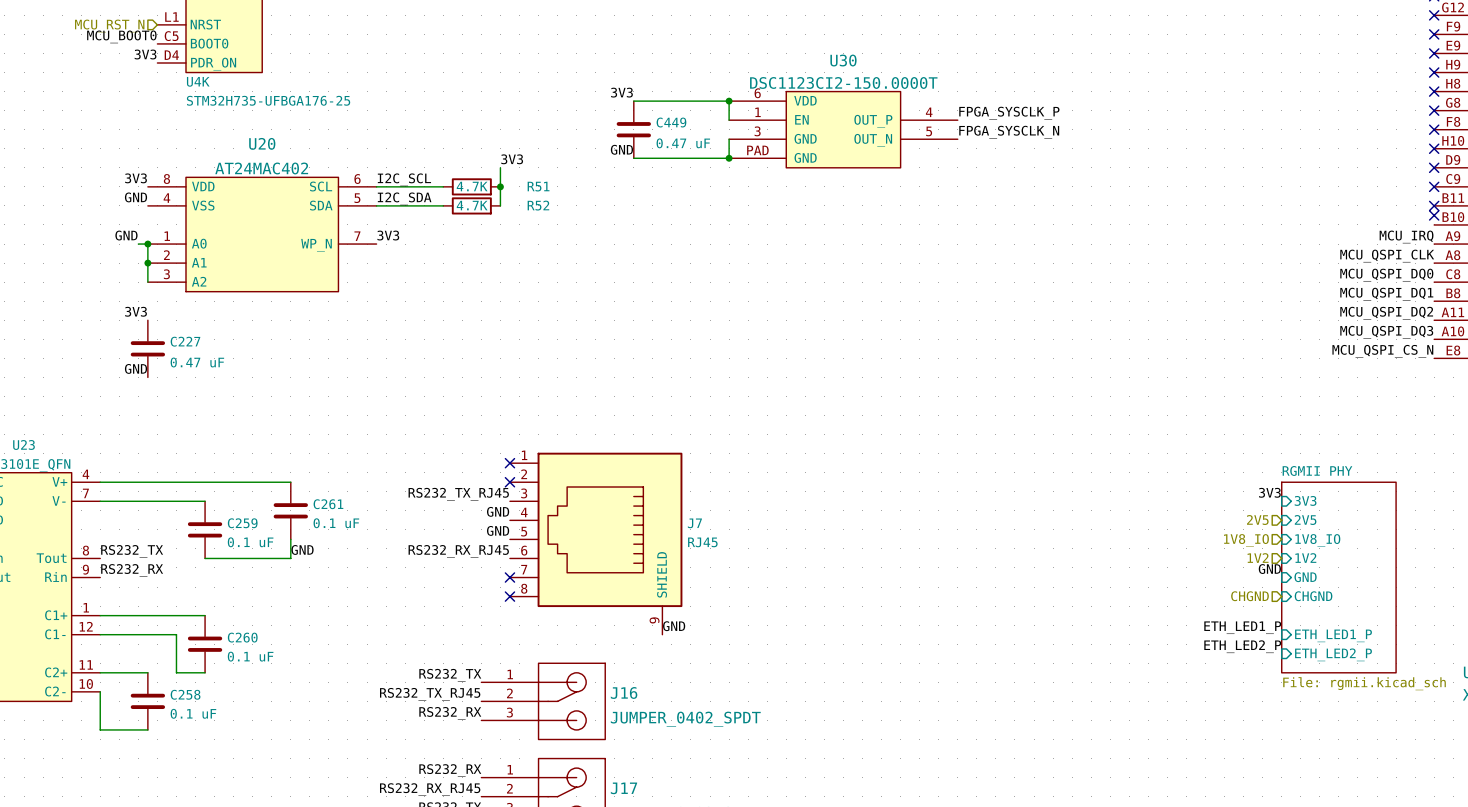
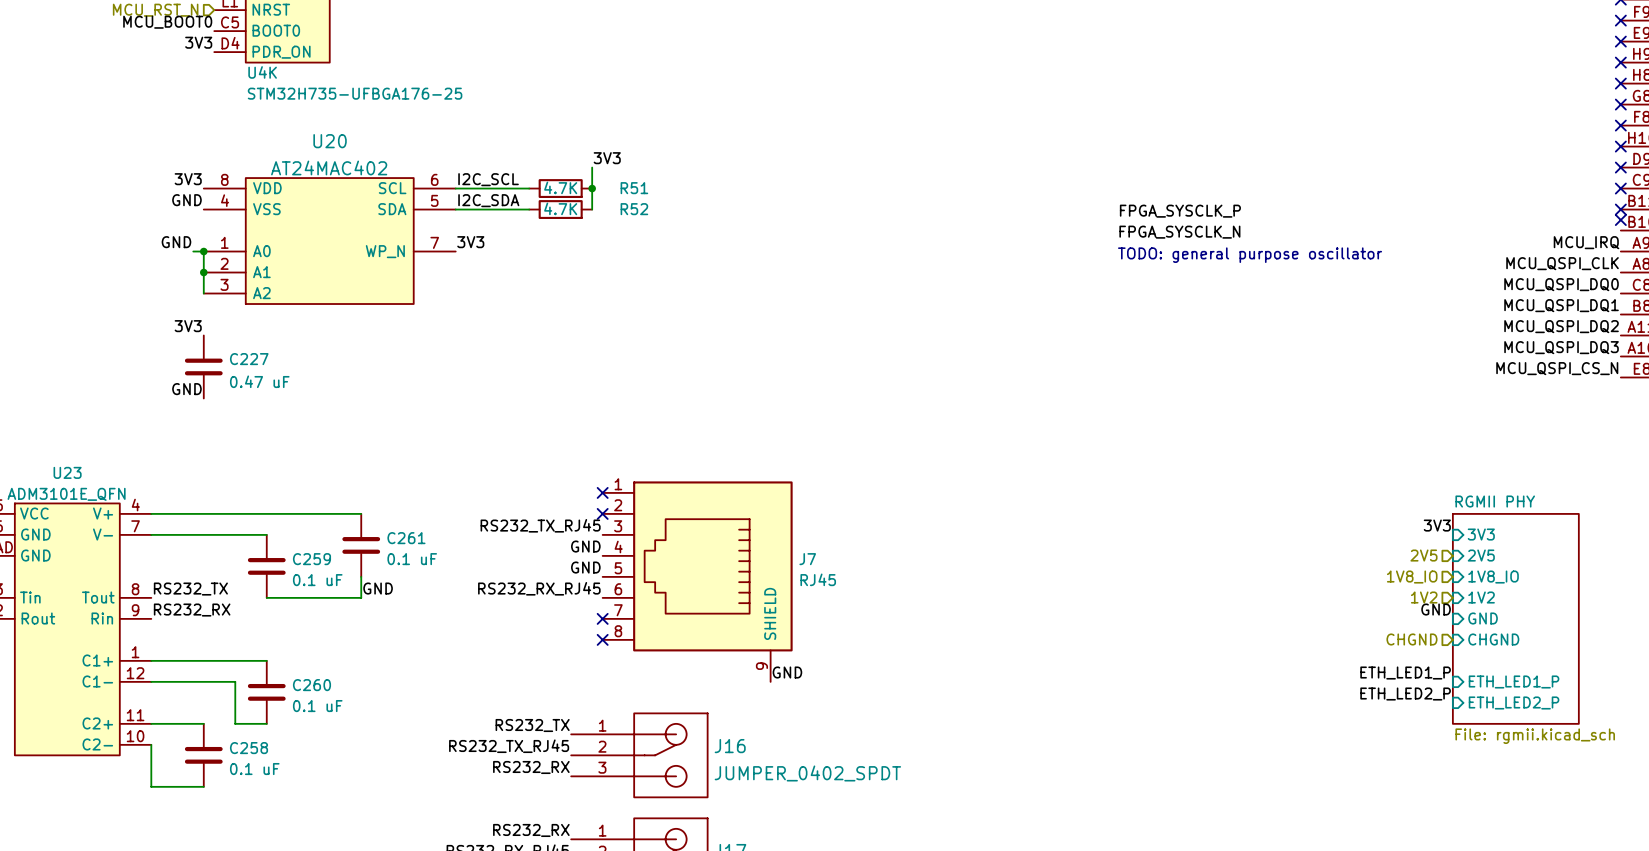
label: 3V3 (621, 92) -> none
wire: (633, 101) (729, 101) (729, 120) -> none
junction: (729, 101) -> none
label position: FPGA_SYSCLK_P (1009, 113) -> FPGA_SYSCLK_P (1180, 211)
C449: 0.47 uF (633, 129) -> none
U30: DSC1123CI2-150.0000T (843, 129) -> none
label position: FPGA_SYSCLK_N (1009, 132) -> FPGA_SYSCLK_N (1179, 232)
wire: (729, 139) (729, 158) (633, 158) -> none
label: GND (621, 149) -> none
junction: (729, 158) -> none
text: none -> TODO: general purpose oscillator (1250, 255)

